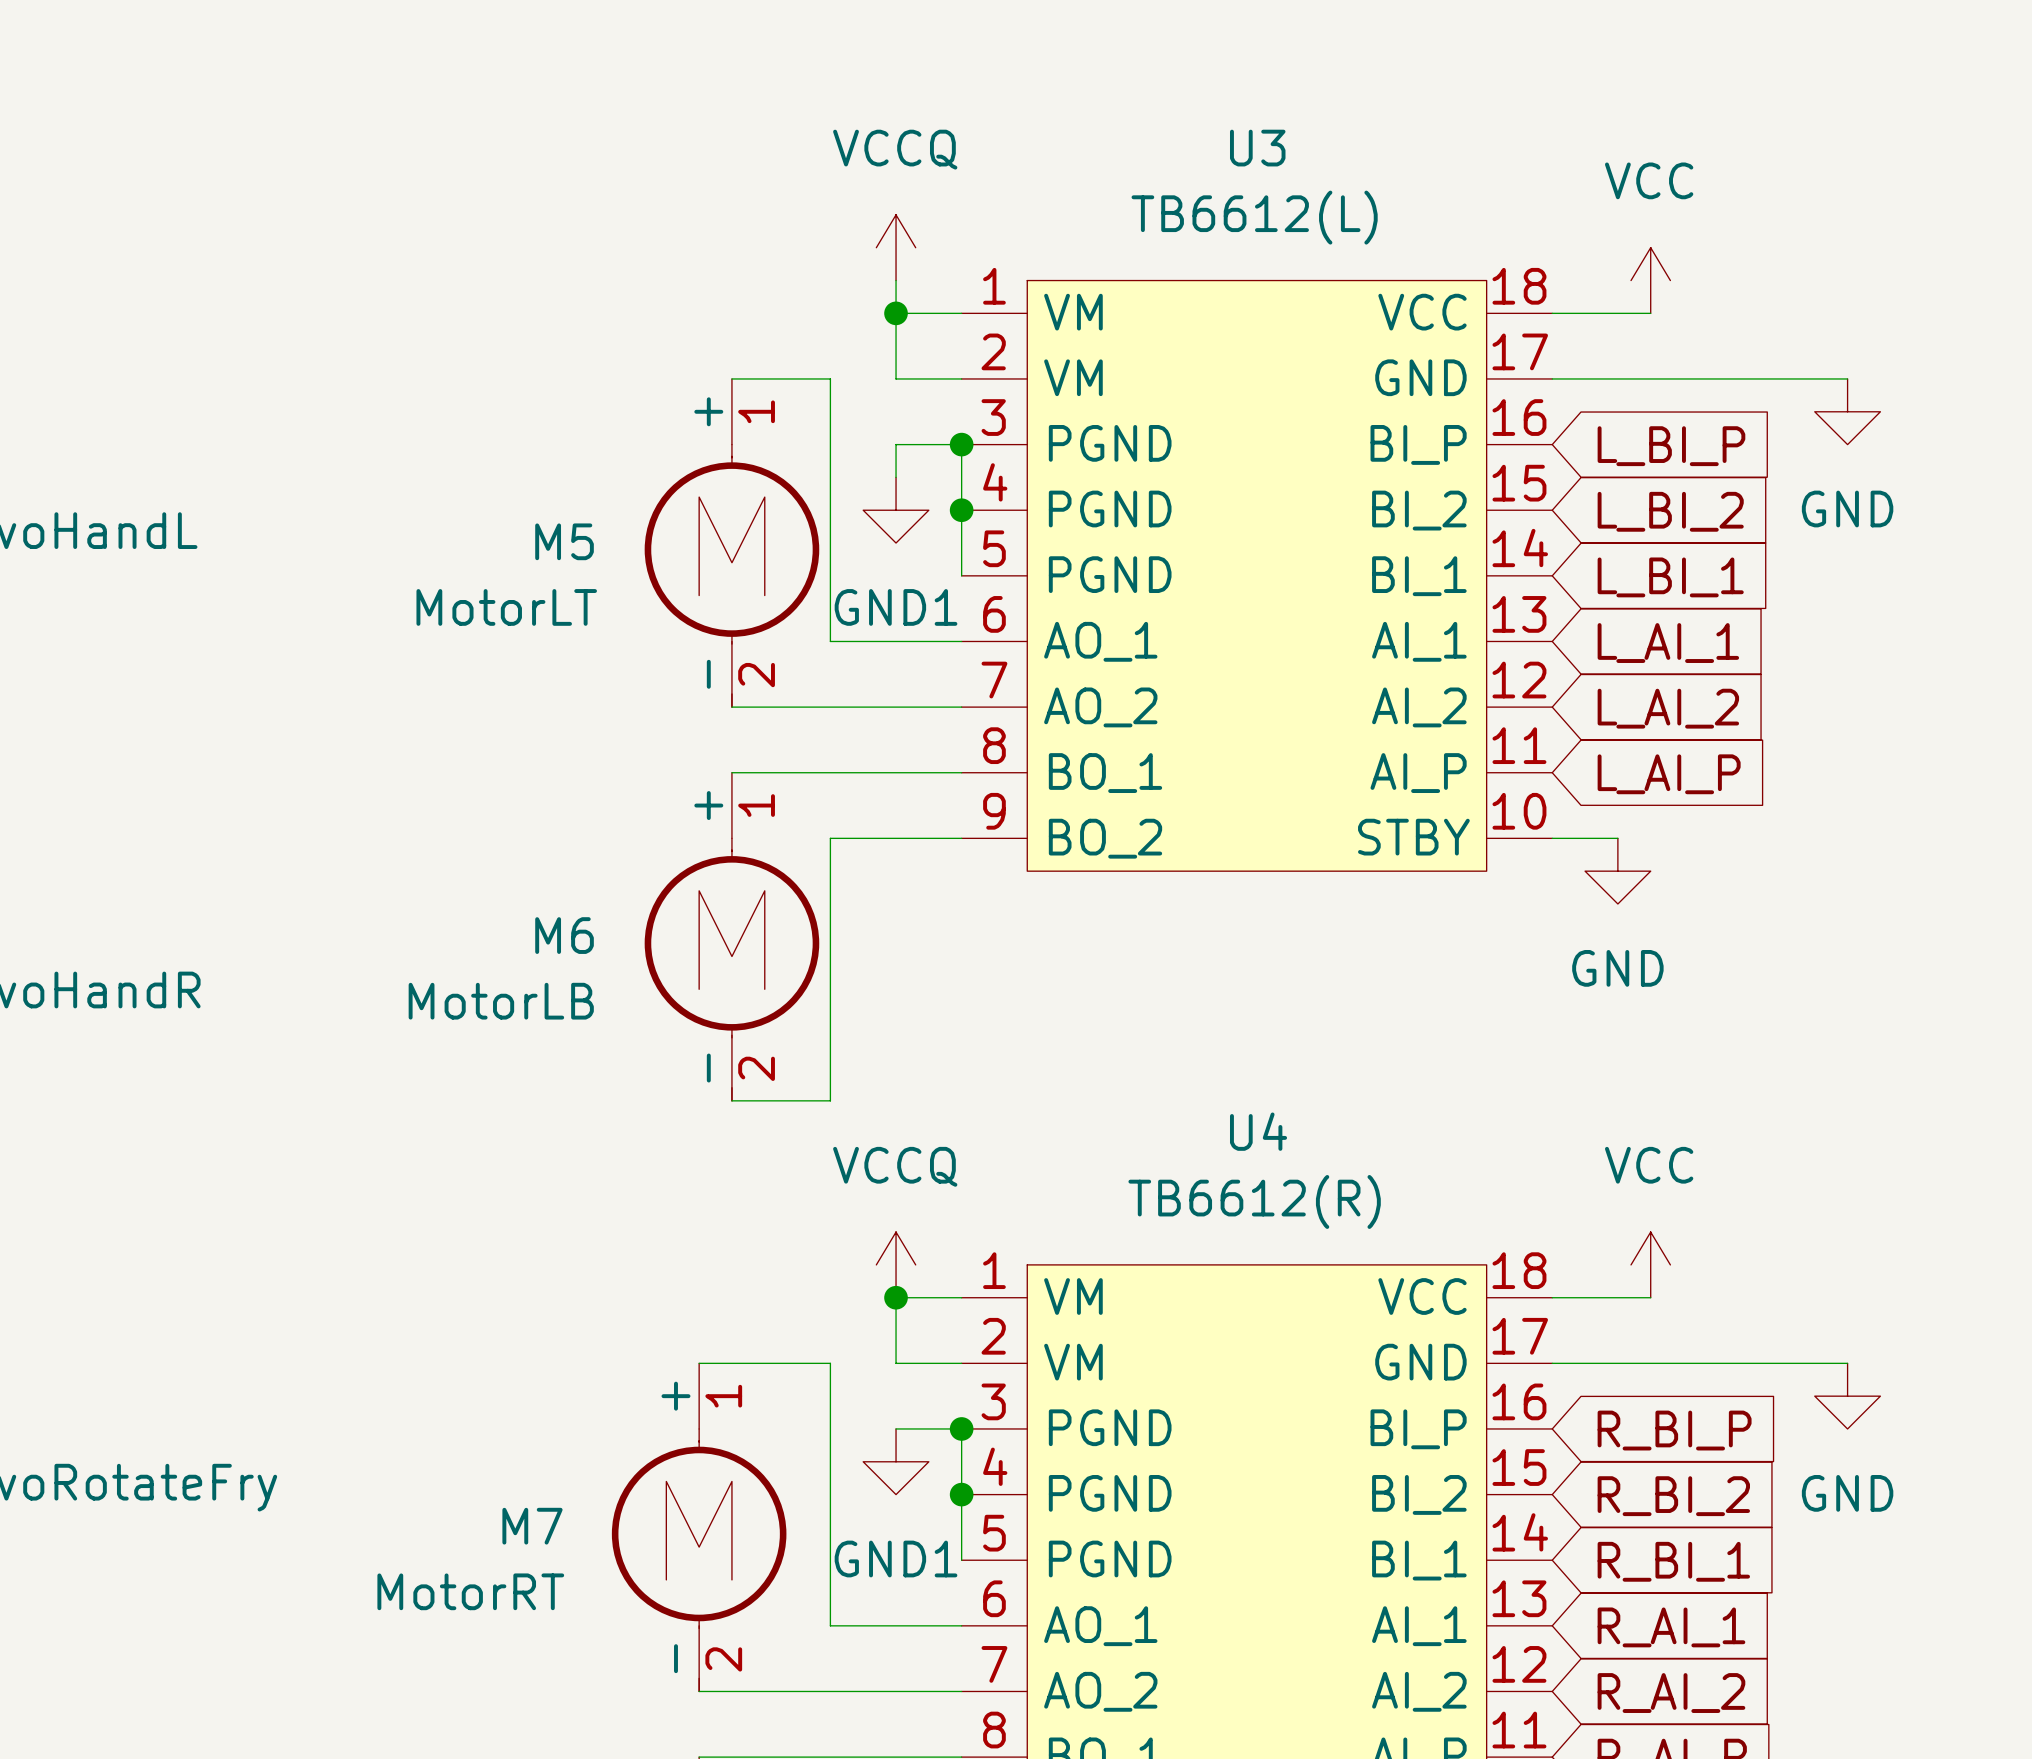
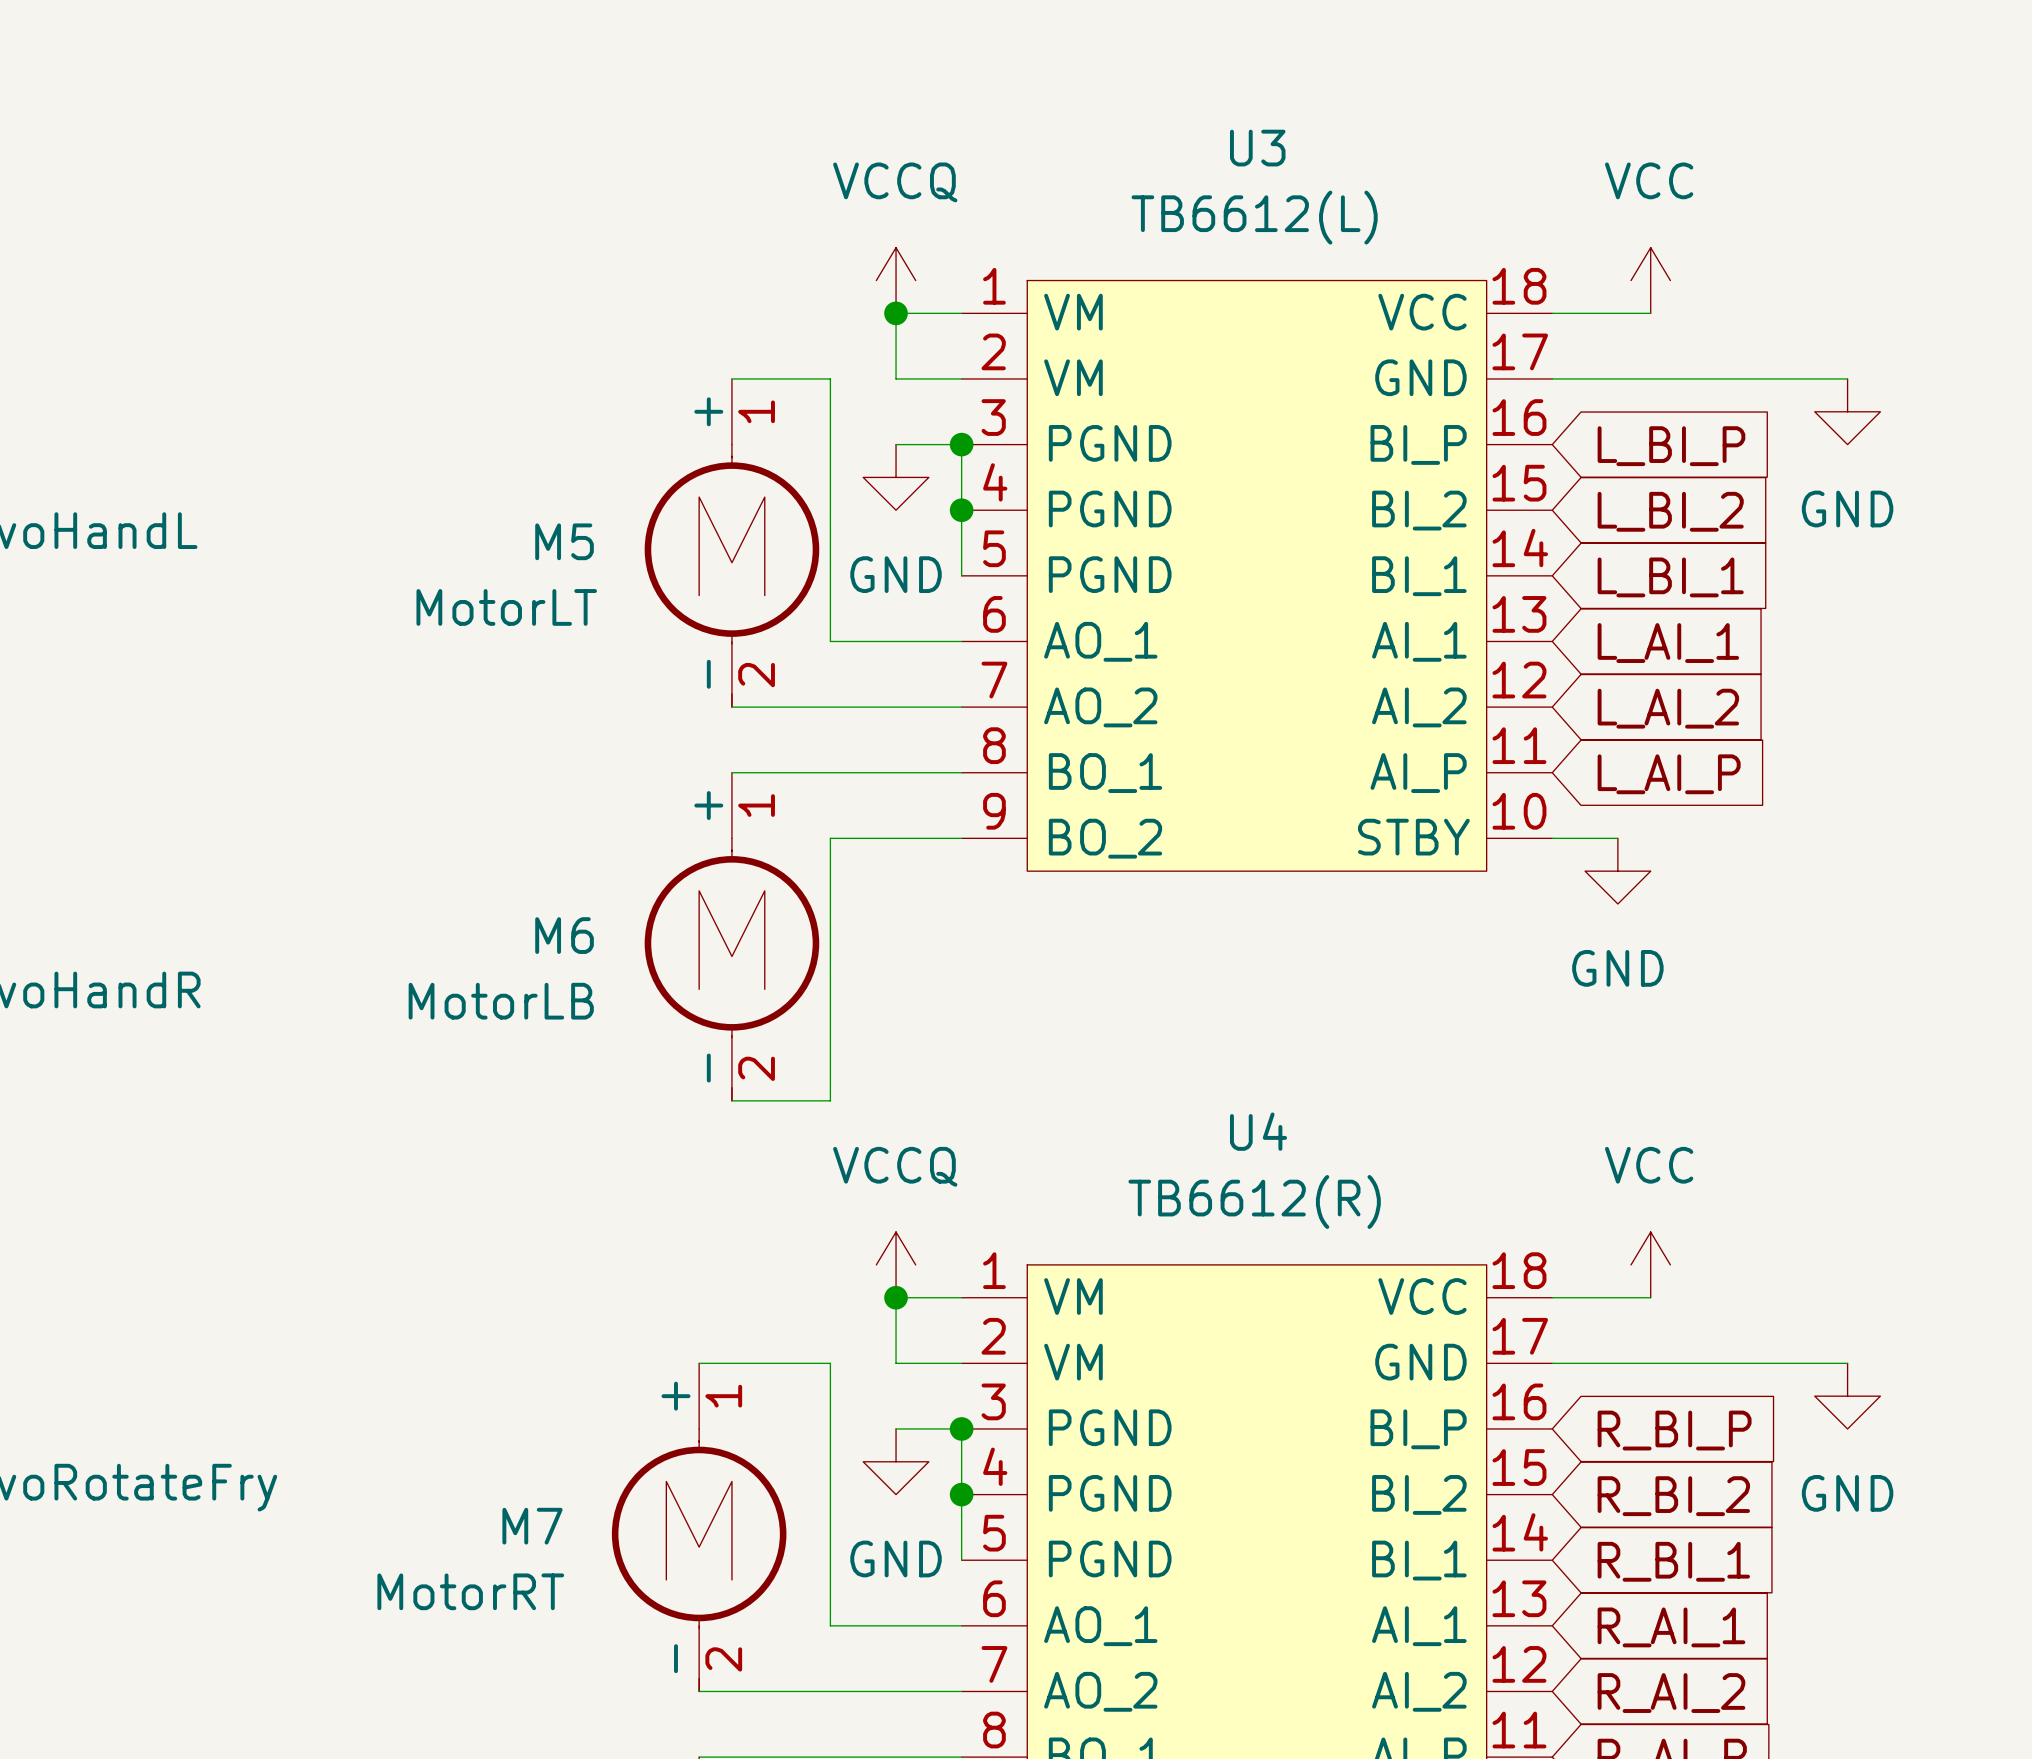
power symbol position: VCCQ (896, 247) -> VCCQ (896, 280)
power symbol: none -> GND (896, 477)
power symbol: GND1 (896, 510) -> none
power symbol: GND1 (896, 1461) -> GND (896, 1461)

